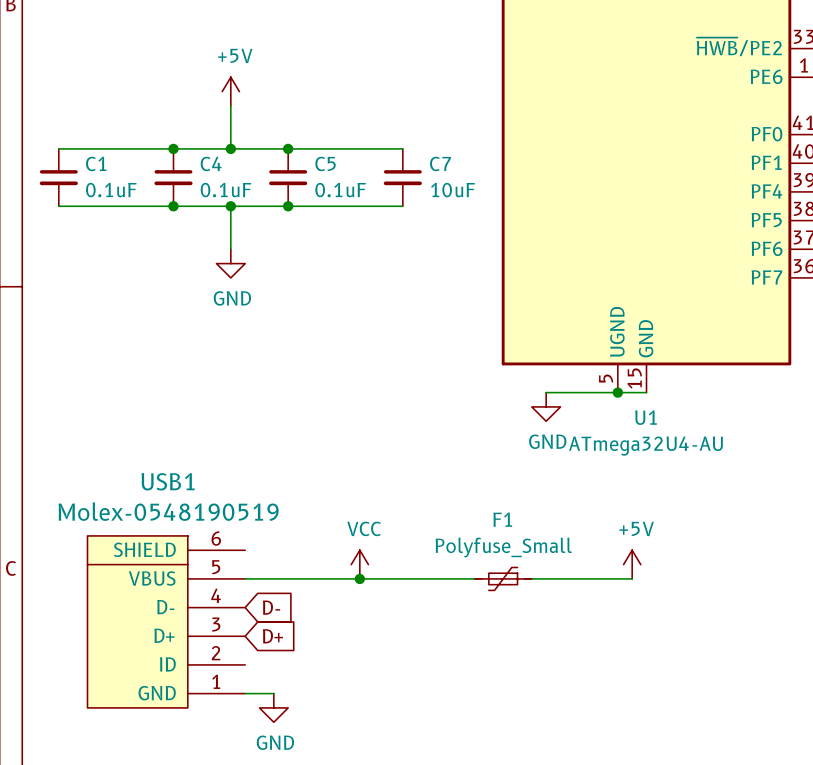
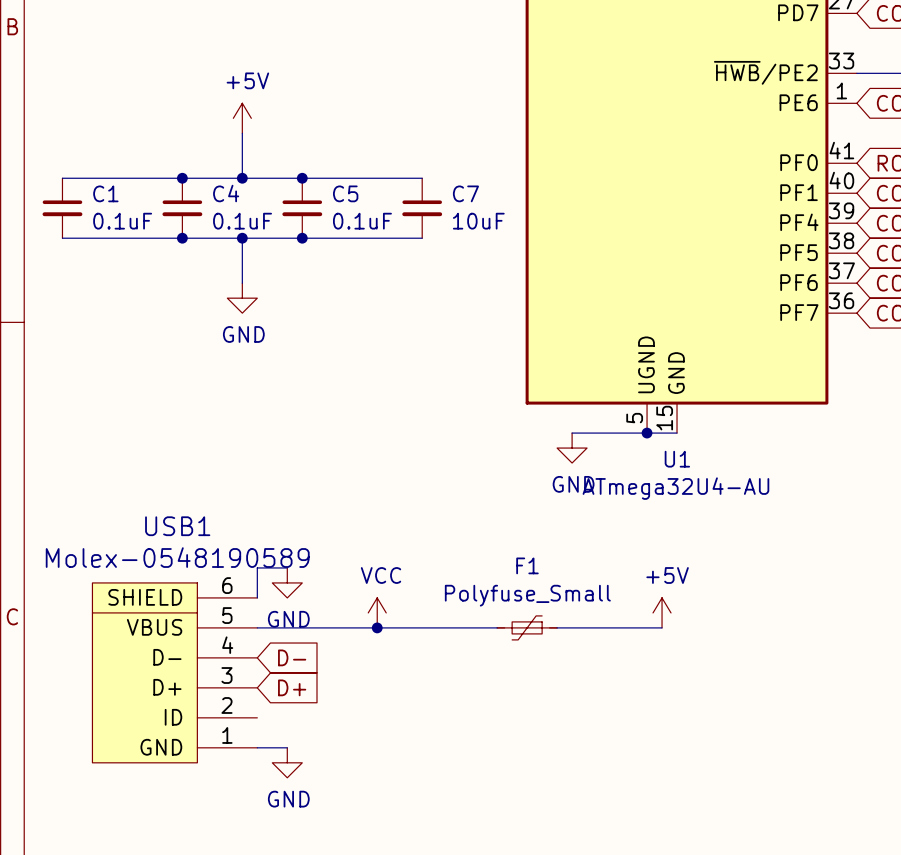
USB1 value: Molex-0548190519 (168, 511) -> Molex-0548190589 (177, 557)
wire: none -> (287, 567) (257, 567) (257, 597)
power symbol: none -> GND (287, 582)

